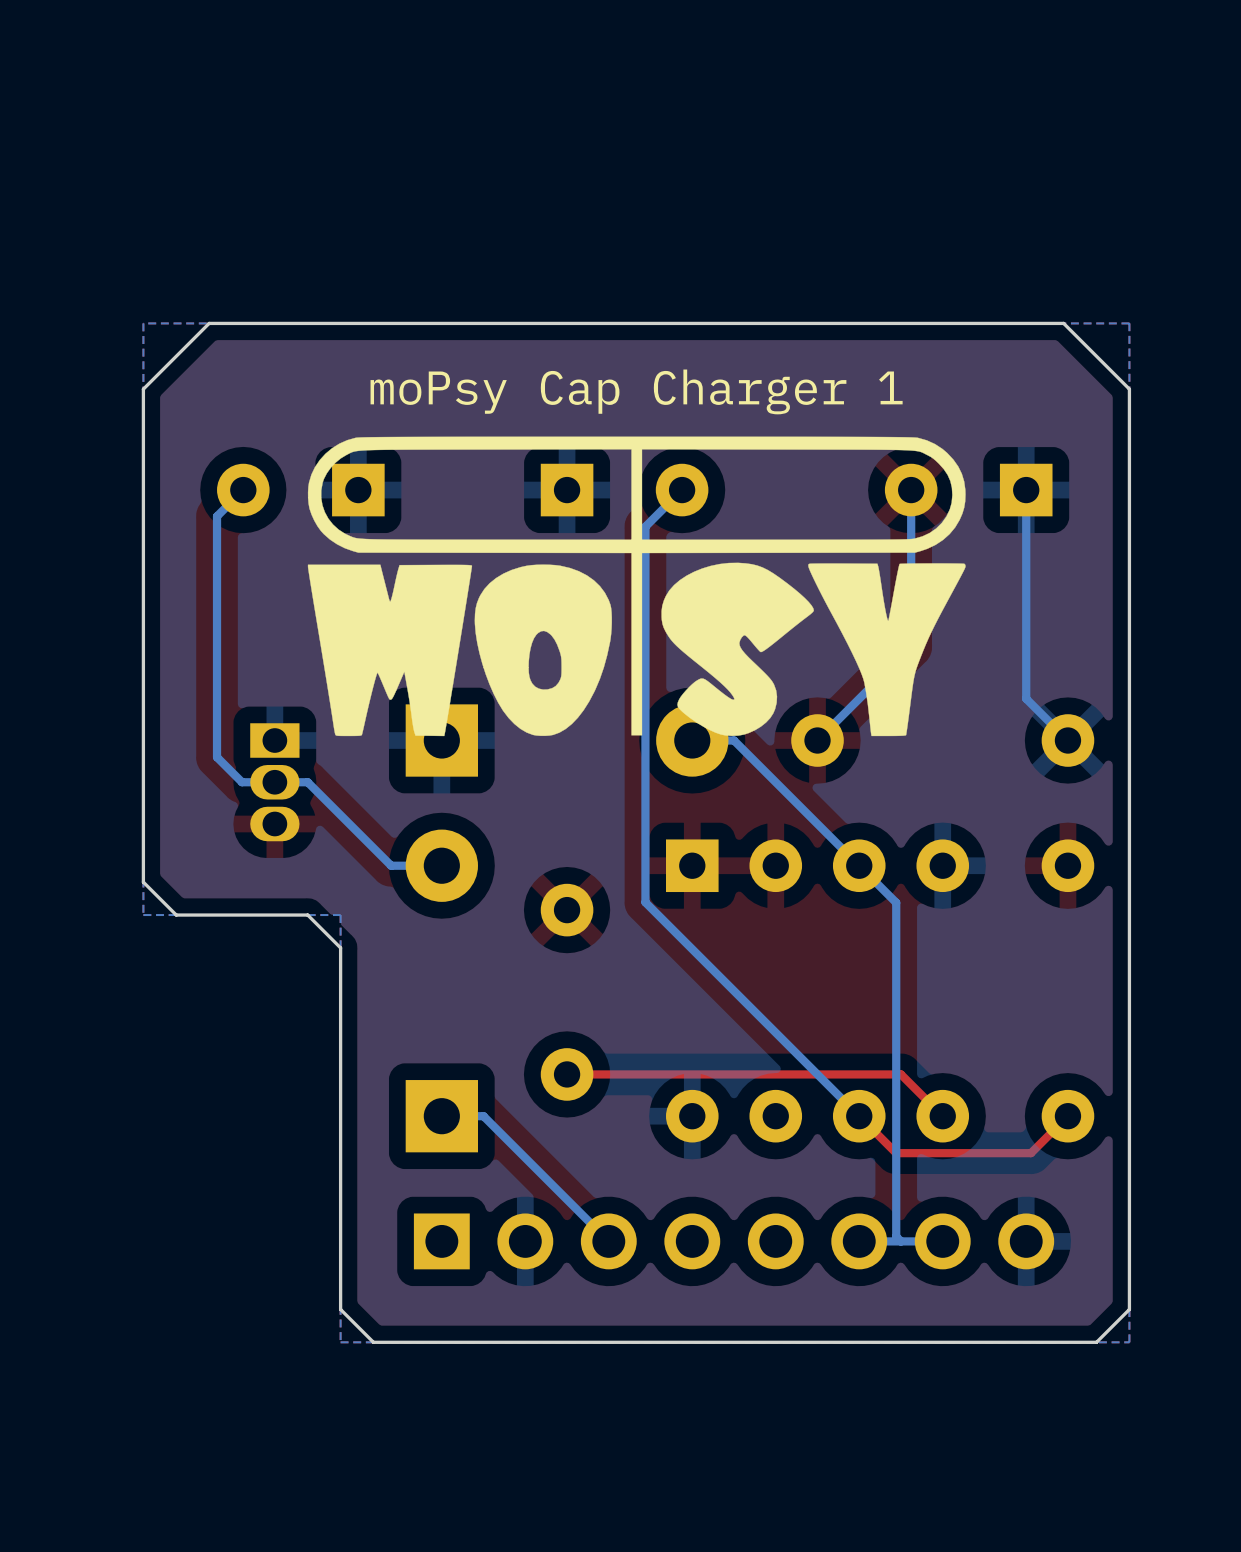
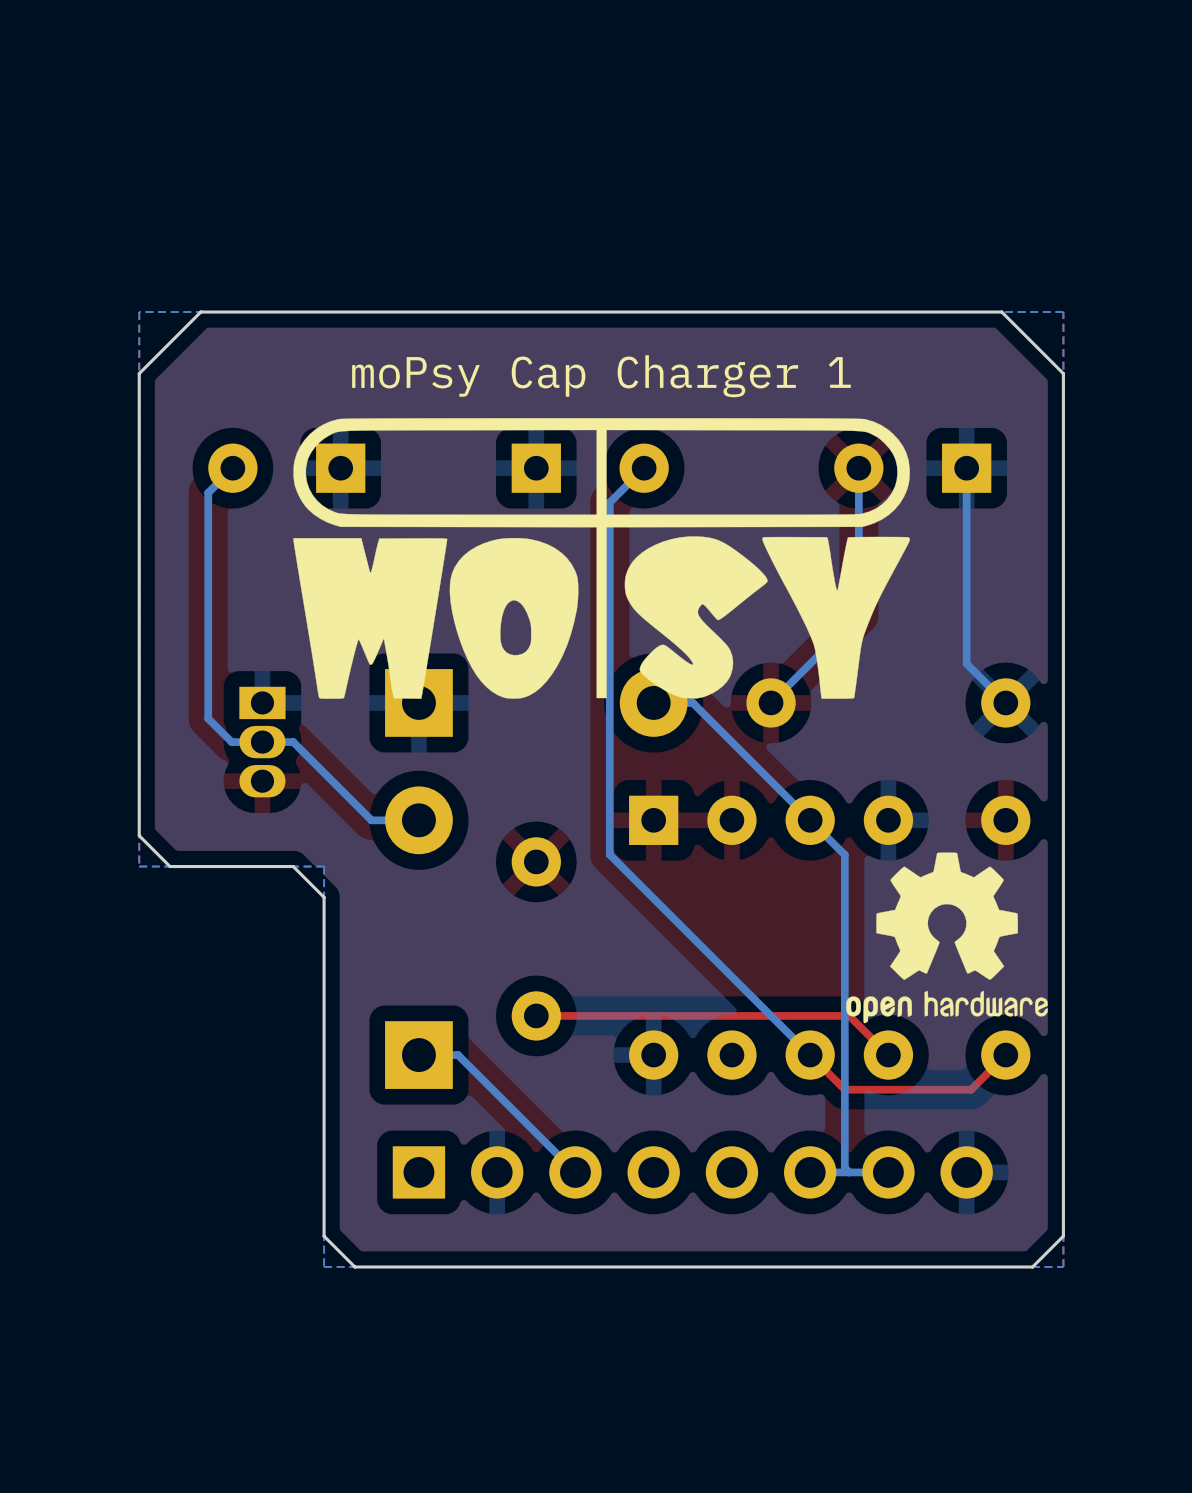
drawing: none -> [846, 852, 1048, 1024]

